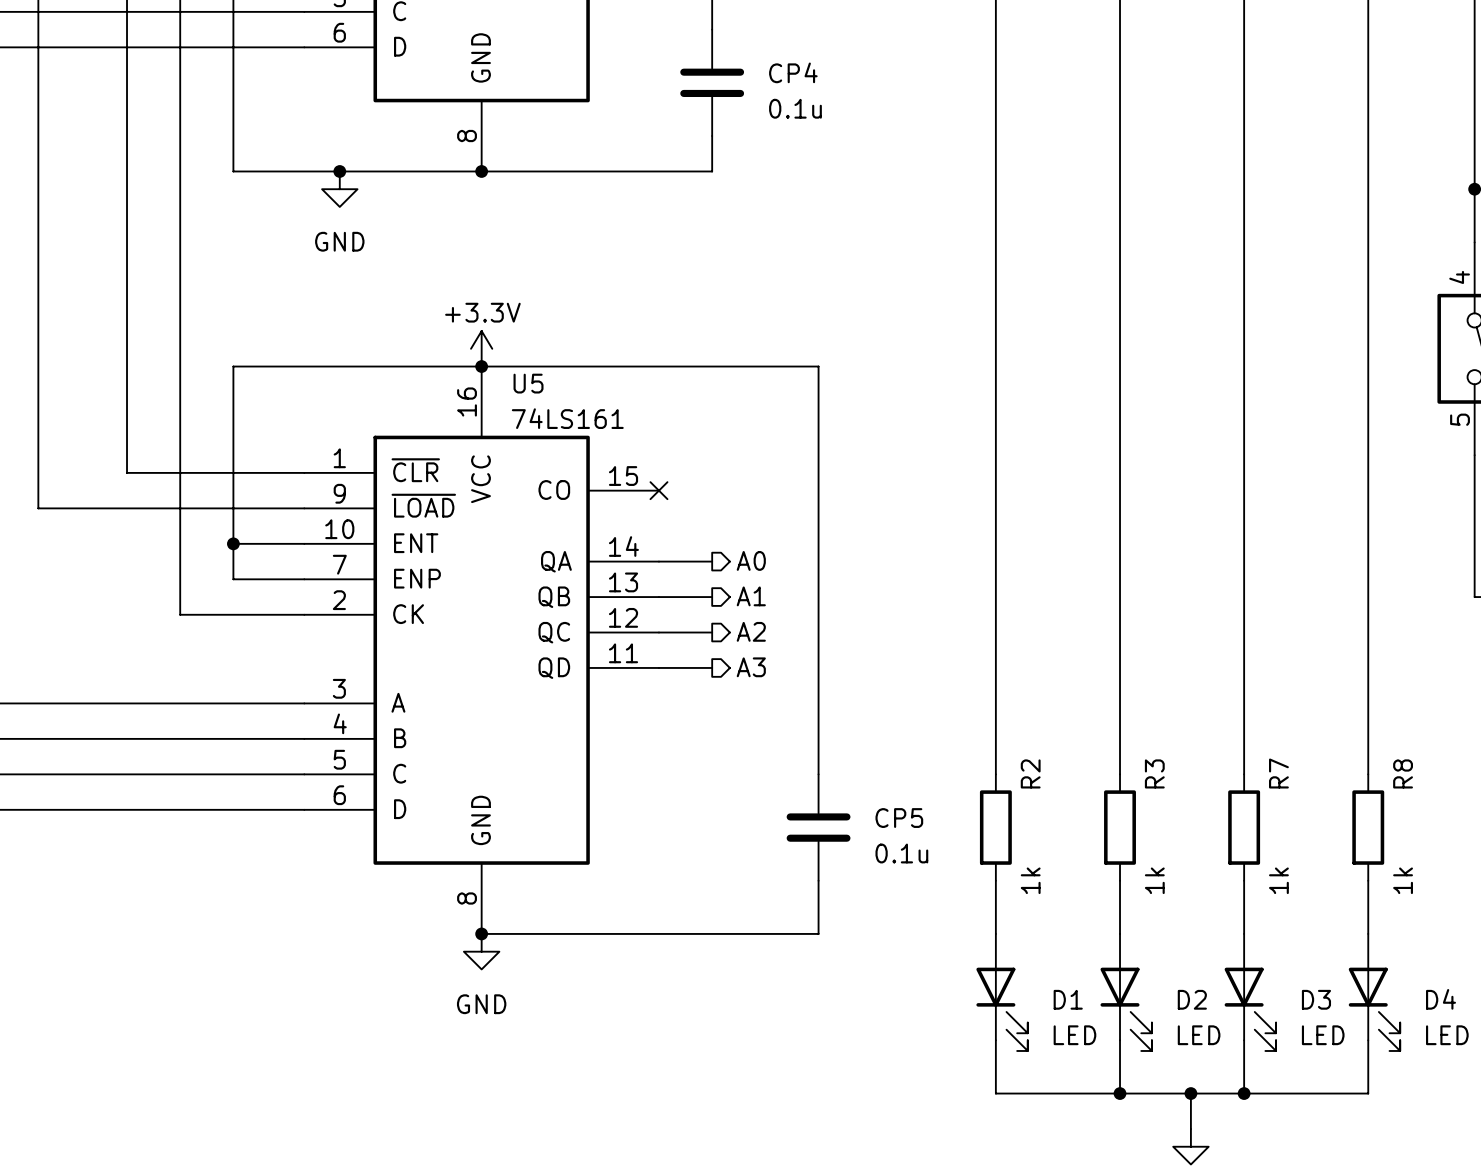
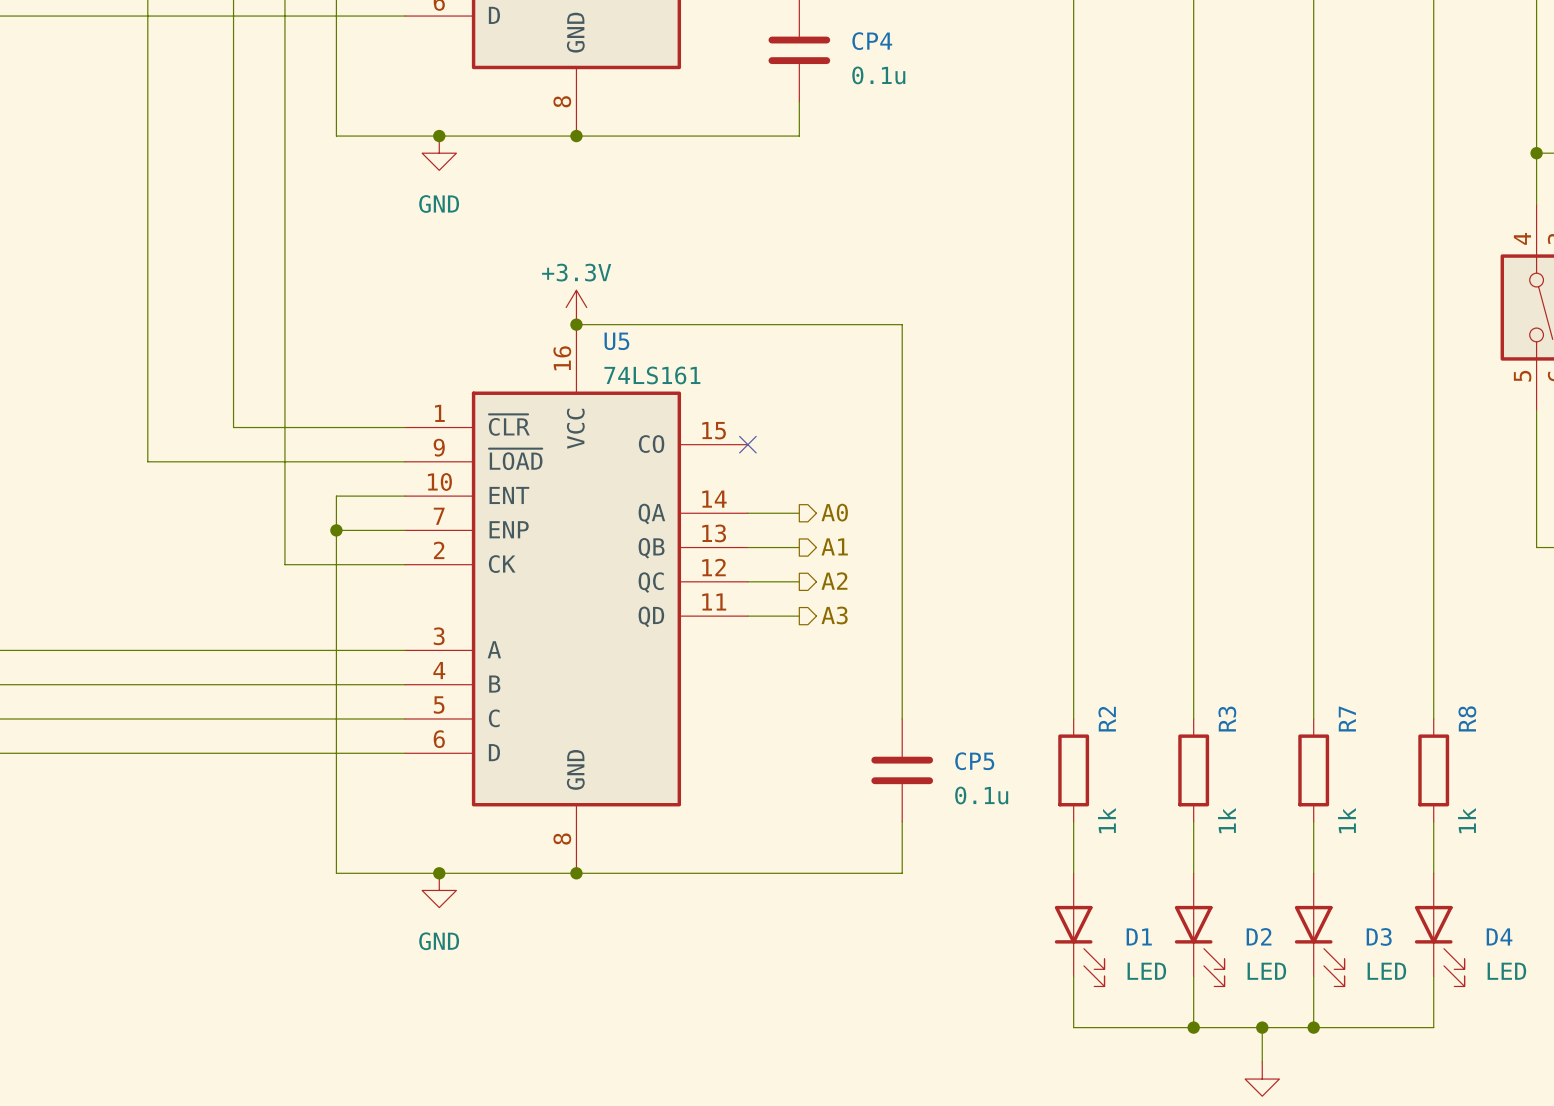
wire: (481, 366) (233, 366) (233, 543) -> none
junction position: (233, 543) -> (336, 530)
wire: none -> (336, 530) (336, 873) (576, 873)
junction: none -> (439, 873)
power symbol position: GND (481, 951) -> GND (439, 890)

